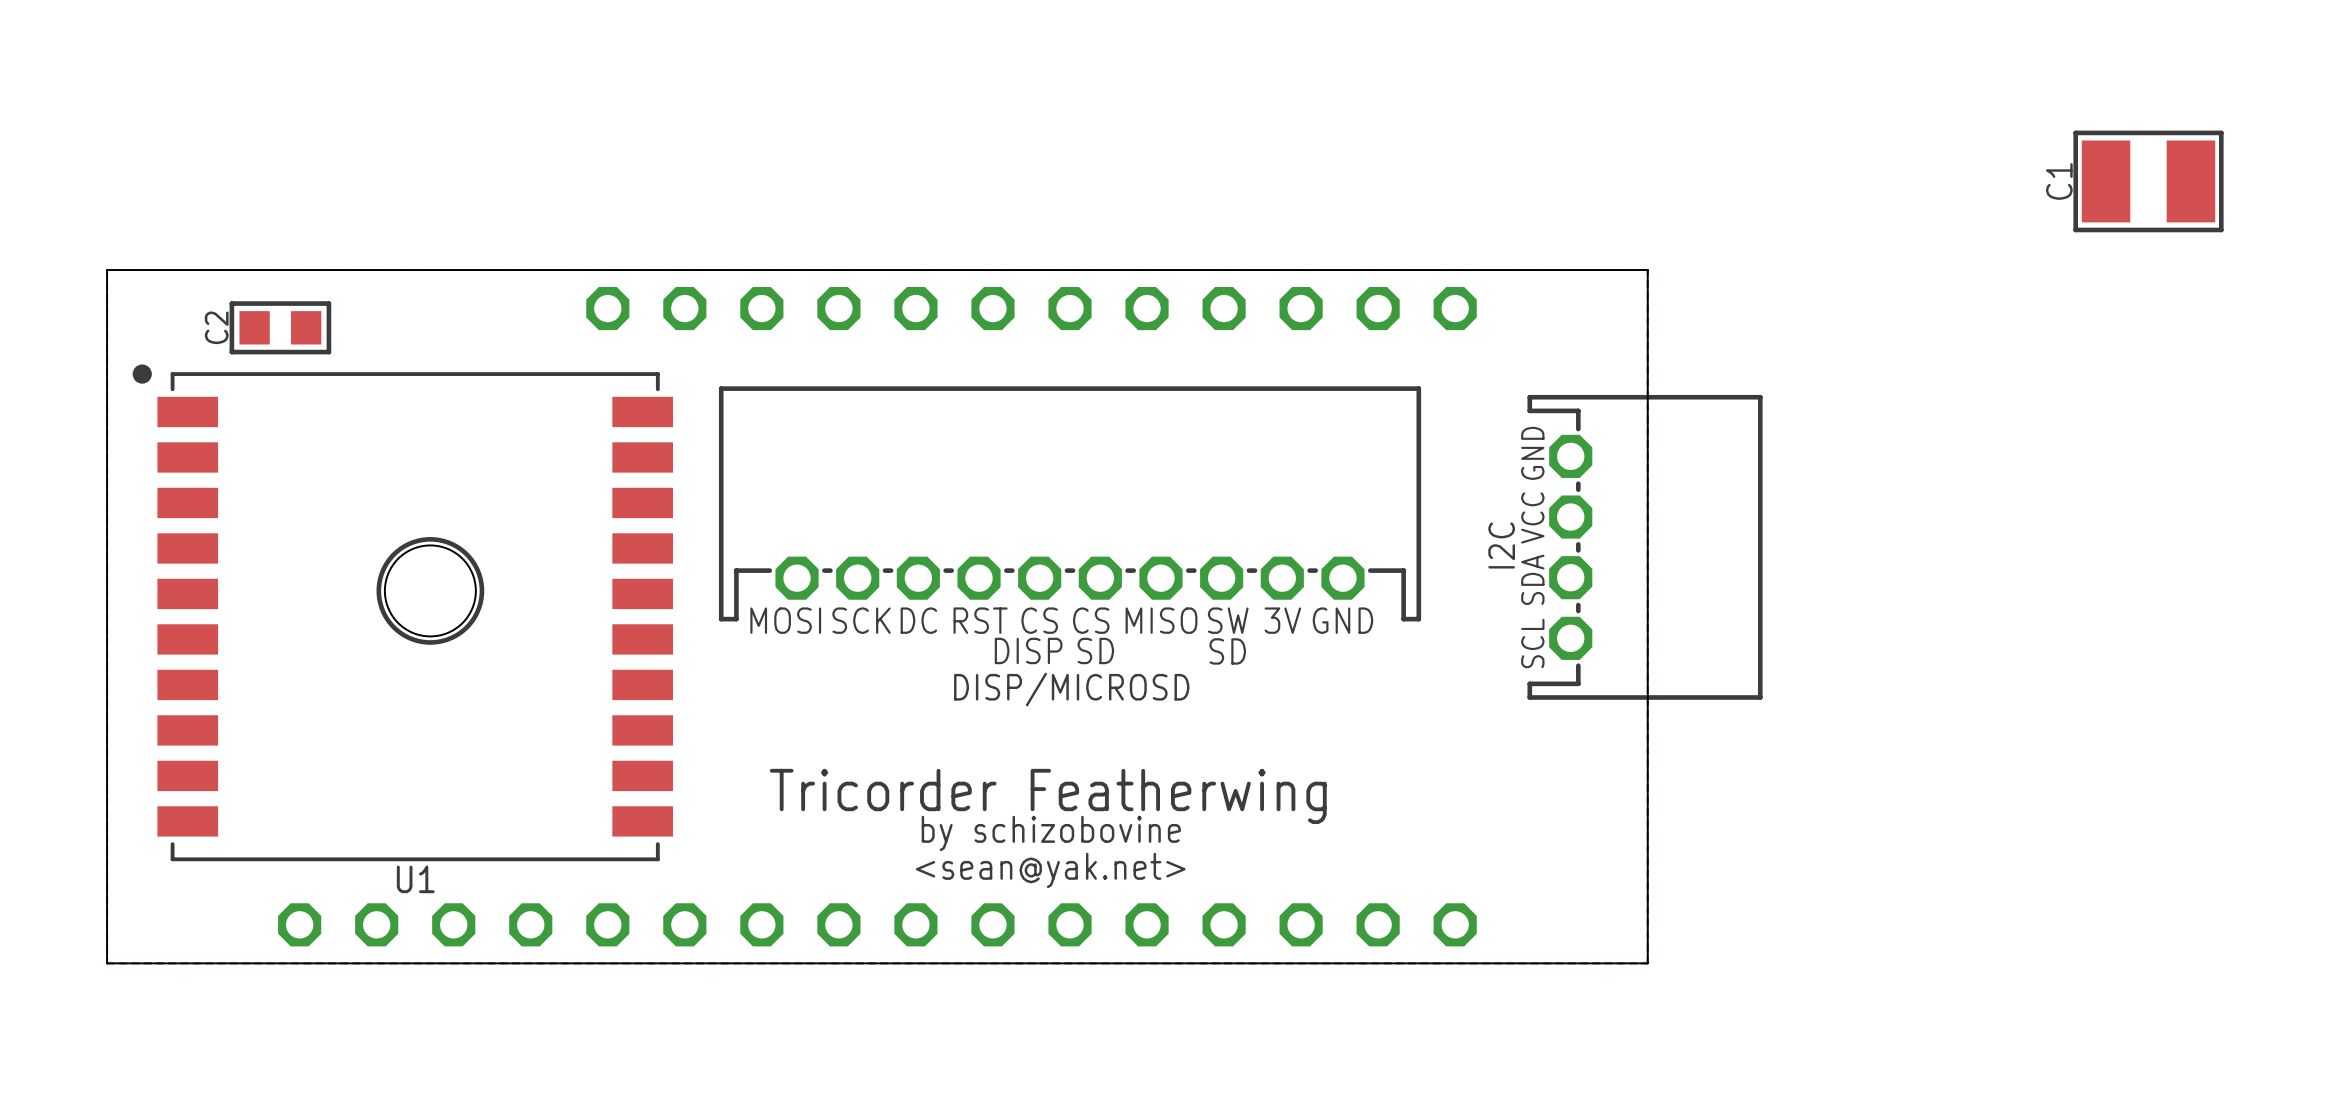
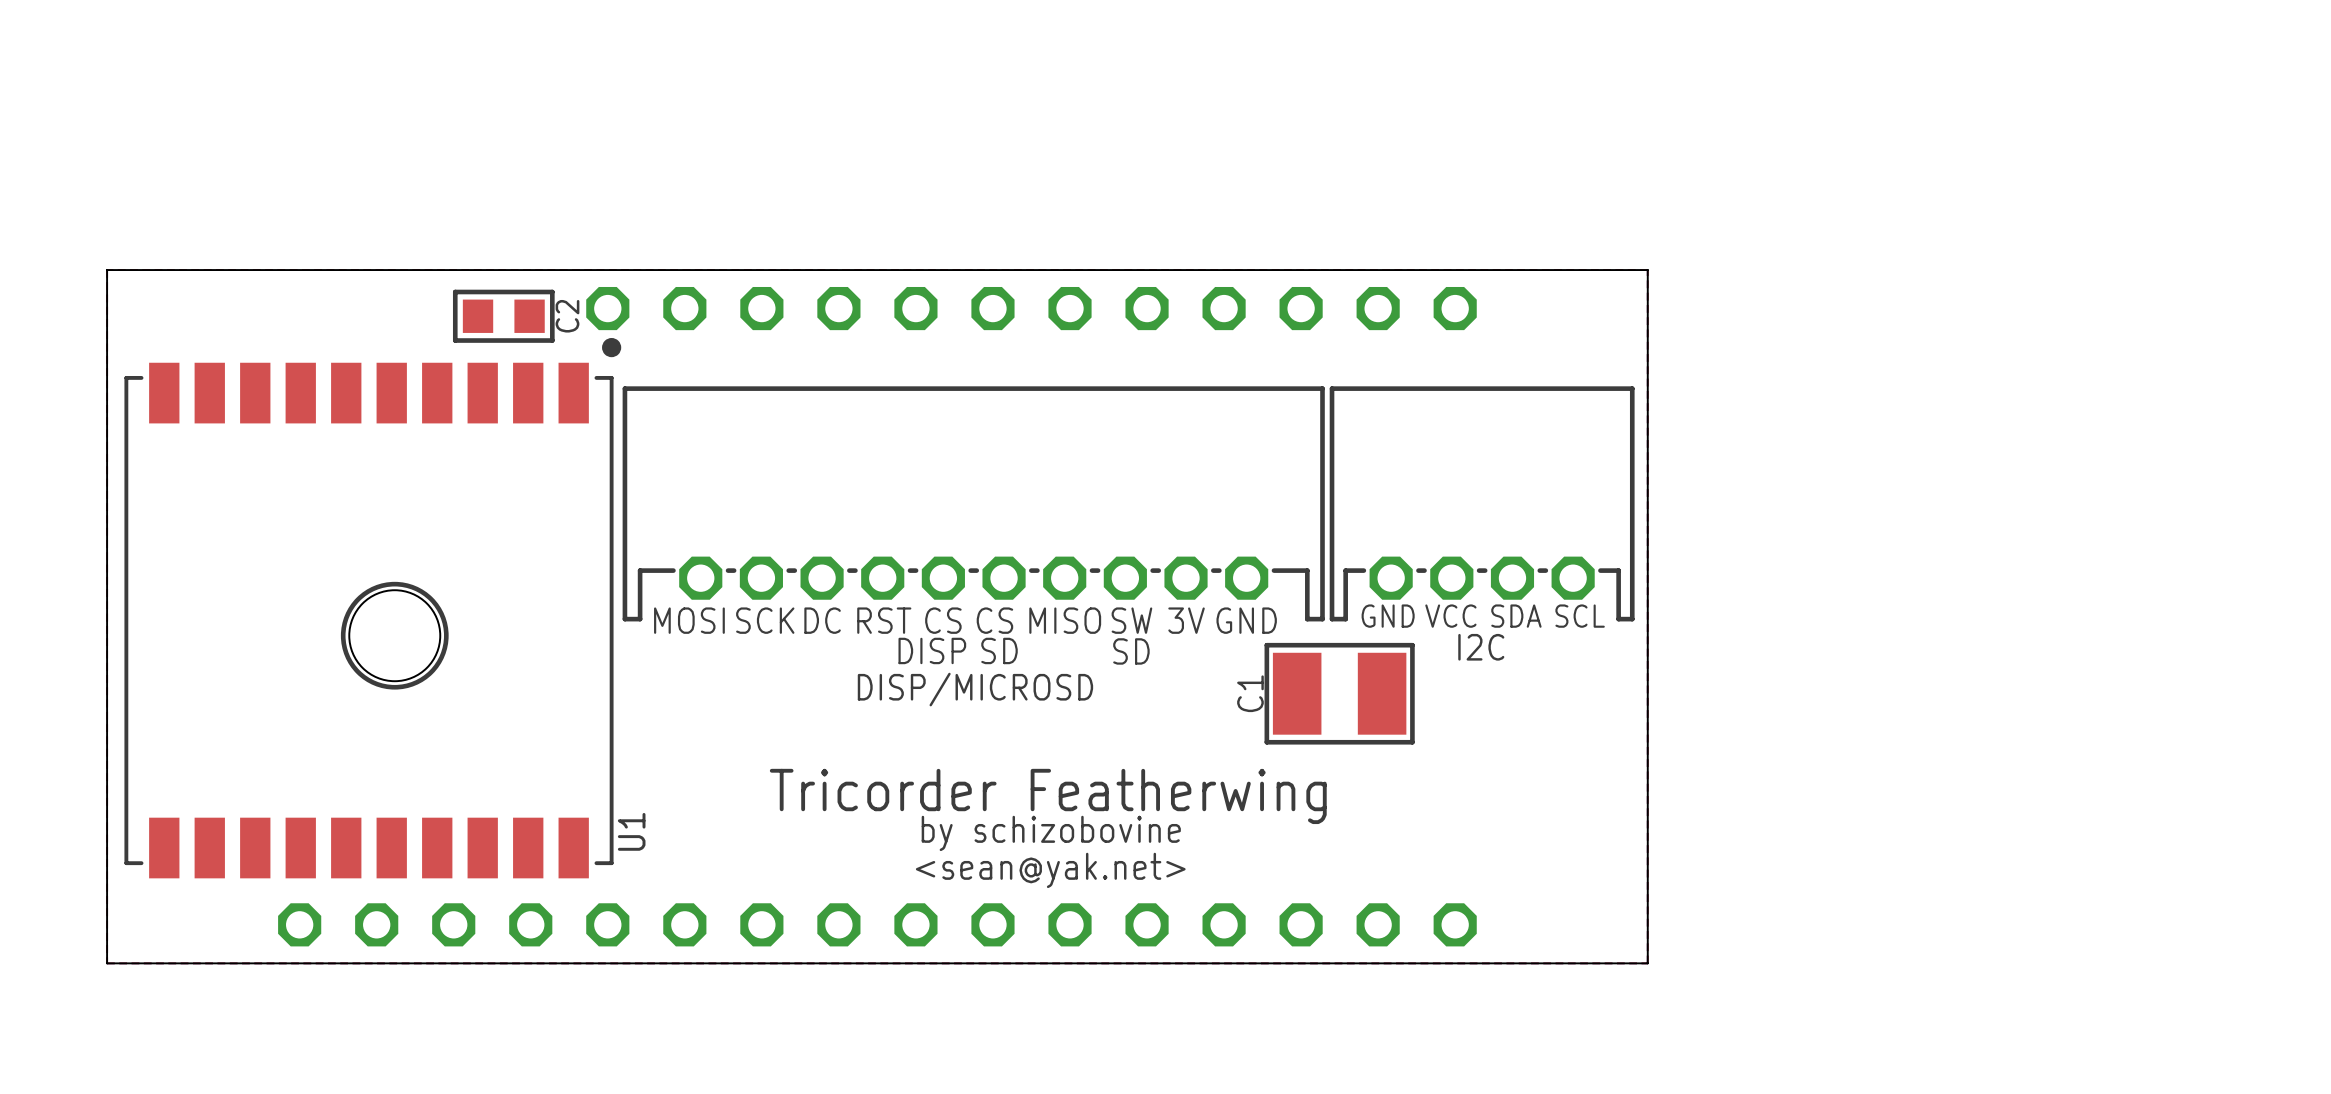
C1 position: (2148, 181) -> (1339, 693)
C2 name position: C2 (216, 327) -> C2 (567, 316)
C2 position: (280, 327) -> (503, 316)
I2C footprint: [1527, 394, 1763, 700] -> [1329, 386, 1635, 622]
DISP/MICROSD position: (1070, 503) -> (973, 503)
I2C name position: I2C (1501, 545) -> I2C (1481, 647)
U1 rotation: 0° (402, 612) -> 90° clockwise (372, 608)
text position: MOSI (785, 620) -> MOSI (689, 620)
text position: SCK (861, 620) -> SCK (765, 620)
text position: DC (918, 620) -> DC (822, 620)
text: none -> CS (943, 620)
text position: RST (980, 620) -> RST (884, 620)
text position: CS (1039, 620) -> CS (994, 620)
text: CS (1091, 620) -> none
text position: MISO (1161, 620) -> MISO (1065, 620)
text position: SW (1228, 620) -> SW (1131, 620)
text position: 3V (1282, 620) -> 3V (1186, 620)
text position: GND (1342, 620) -> GND (1246, 620)
text: none -> SD (999, 650)
text position: DISP (1028, 650) -> DISP (932, 650)
text position: SD (1095, 650) -> SD (1131, 651)
text: SD (1227, 651) -> none
U1 name position: U1 (415, 879) -> U1 (631, 831)

